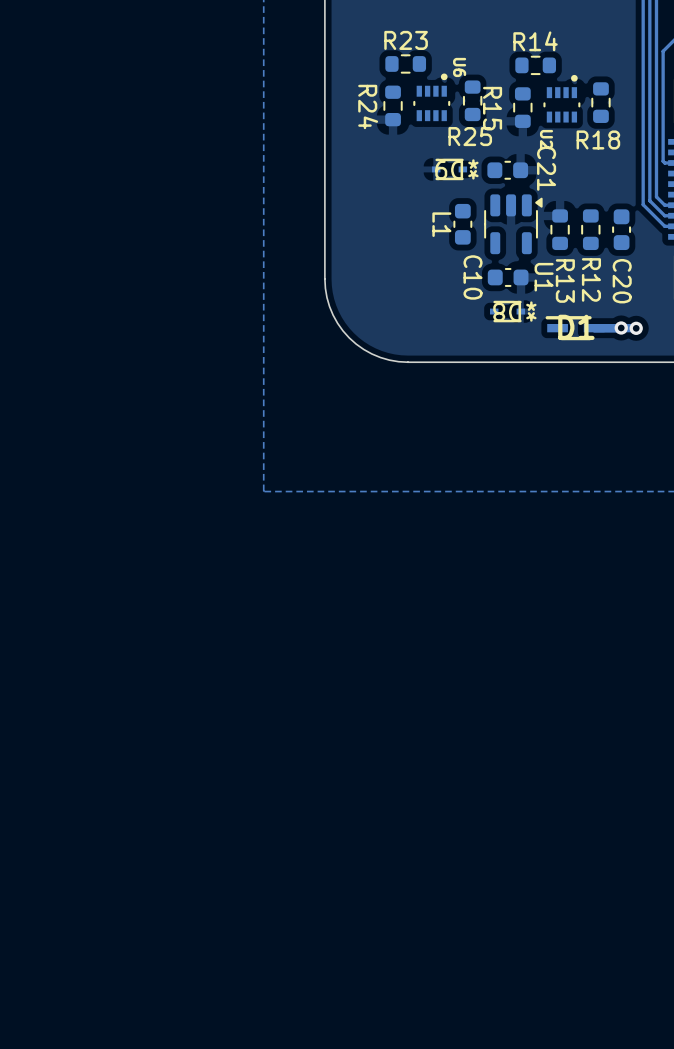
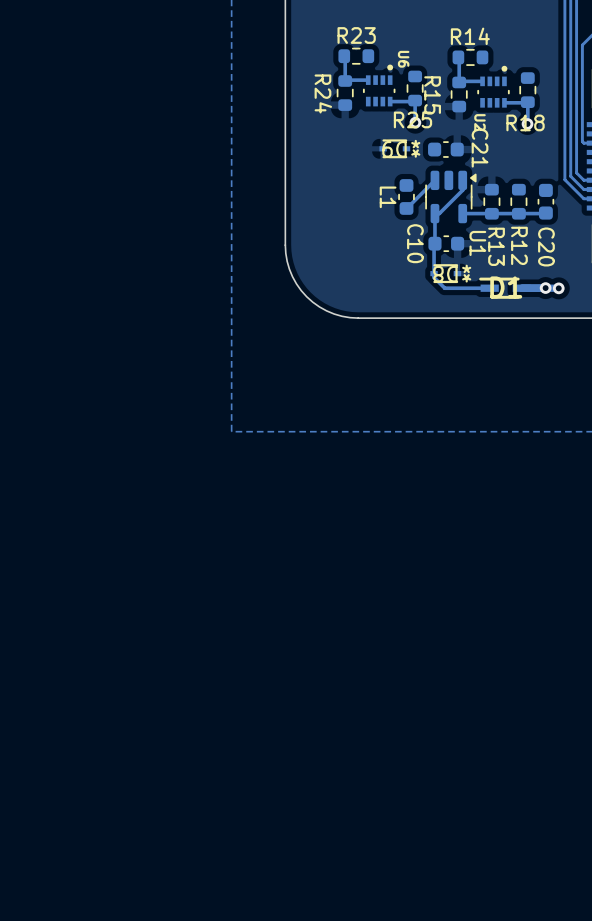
track: none -> (344, 56) (345, 81) (368, 80)
track: none -> (458, 57) (459, 82) (482, 81)
track: none -> (390, 101) (415, 100) (415, 122)
track: none -> (504, 102) (527, 102) (527, 123)
via: none -> (415, 122)
via: none -> (527, 123)
track: none -> (434, 180) (406, 208)
track: none -> (462, 180) (462, 190) (439, 213) (434, 213) (434, 277) (444, 288) (489, 288)
track: none -> (545, 213) (462, 213)

